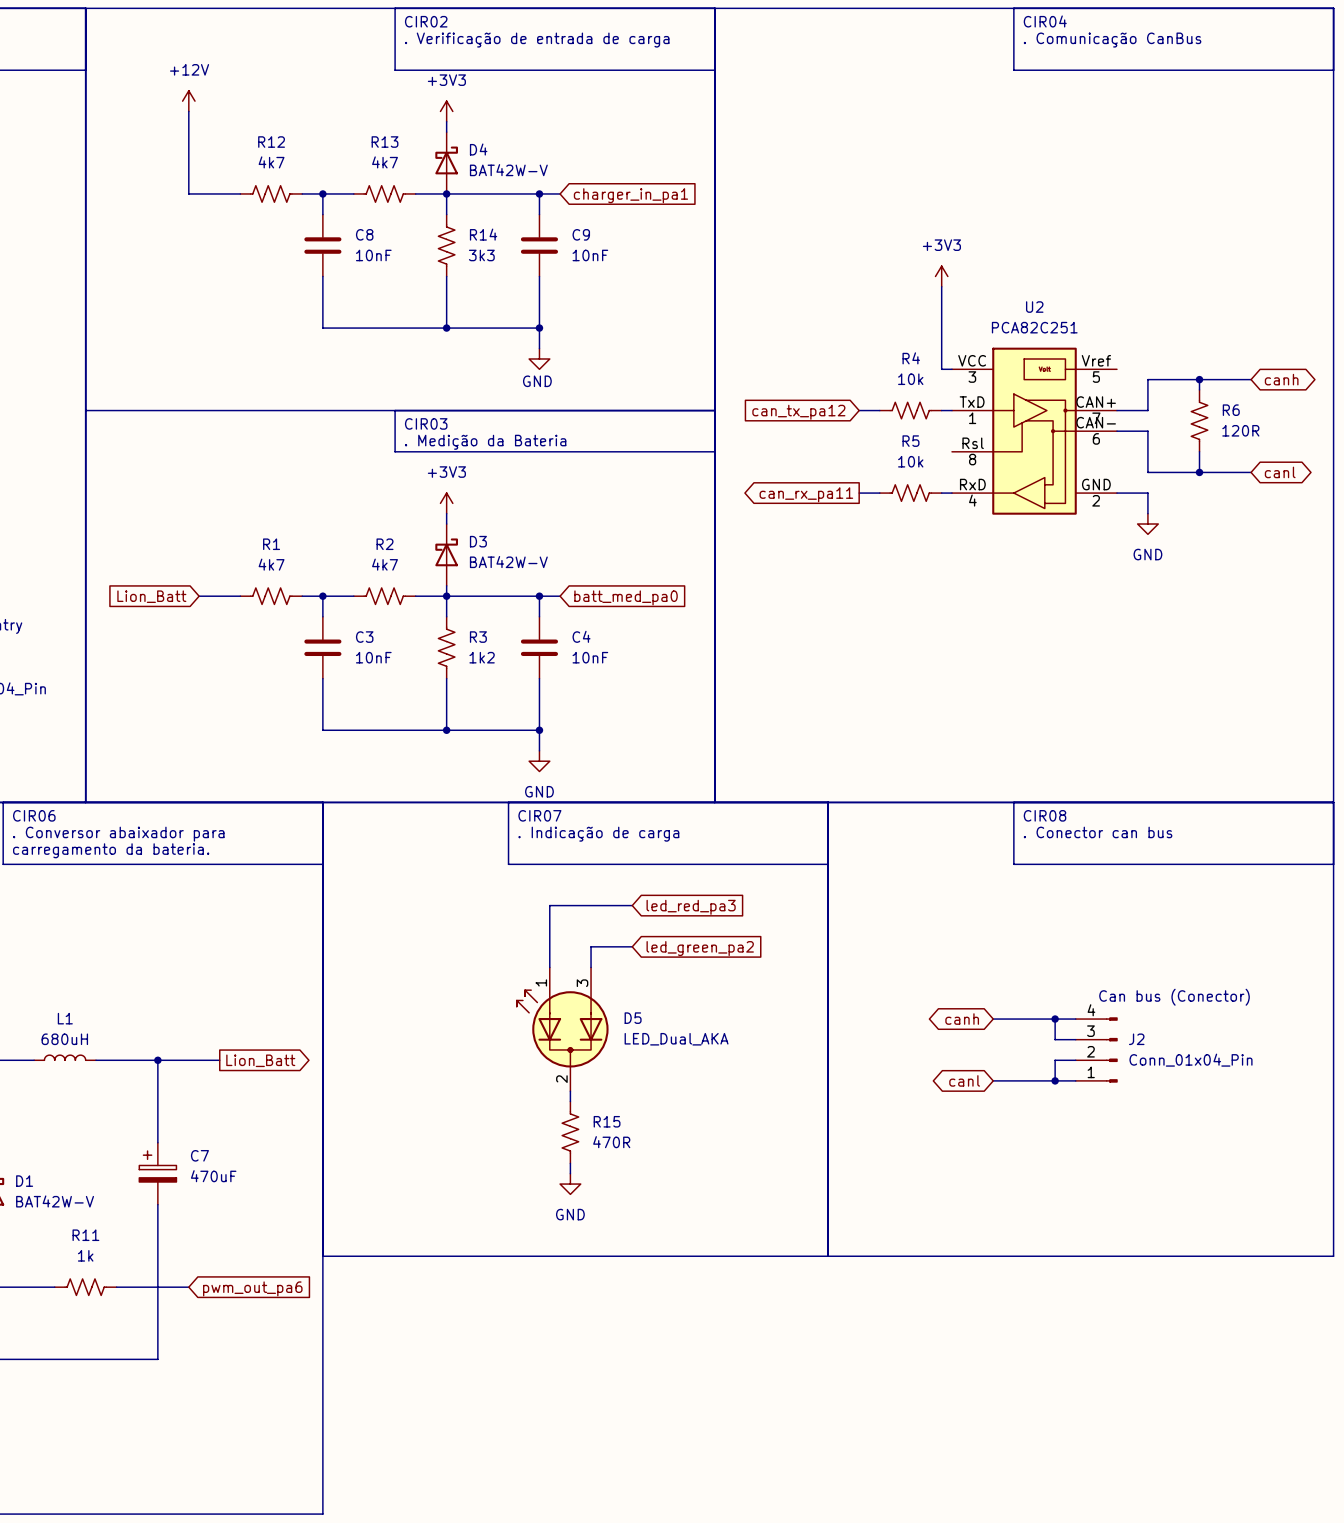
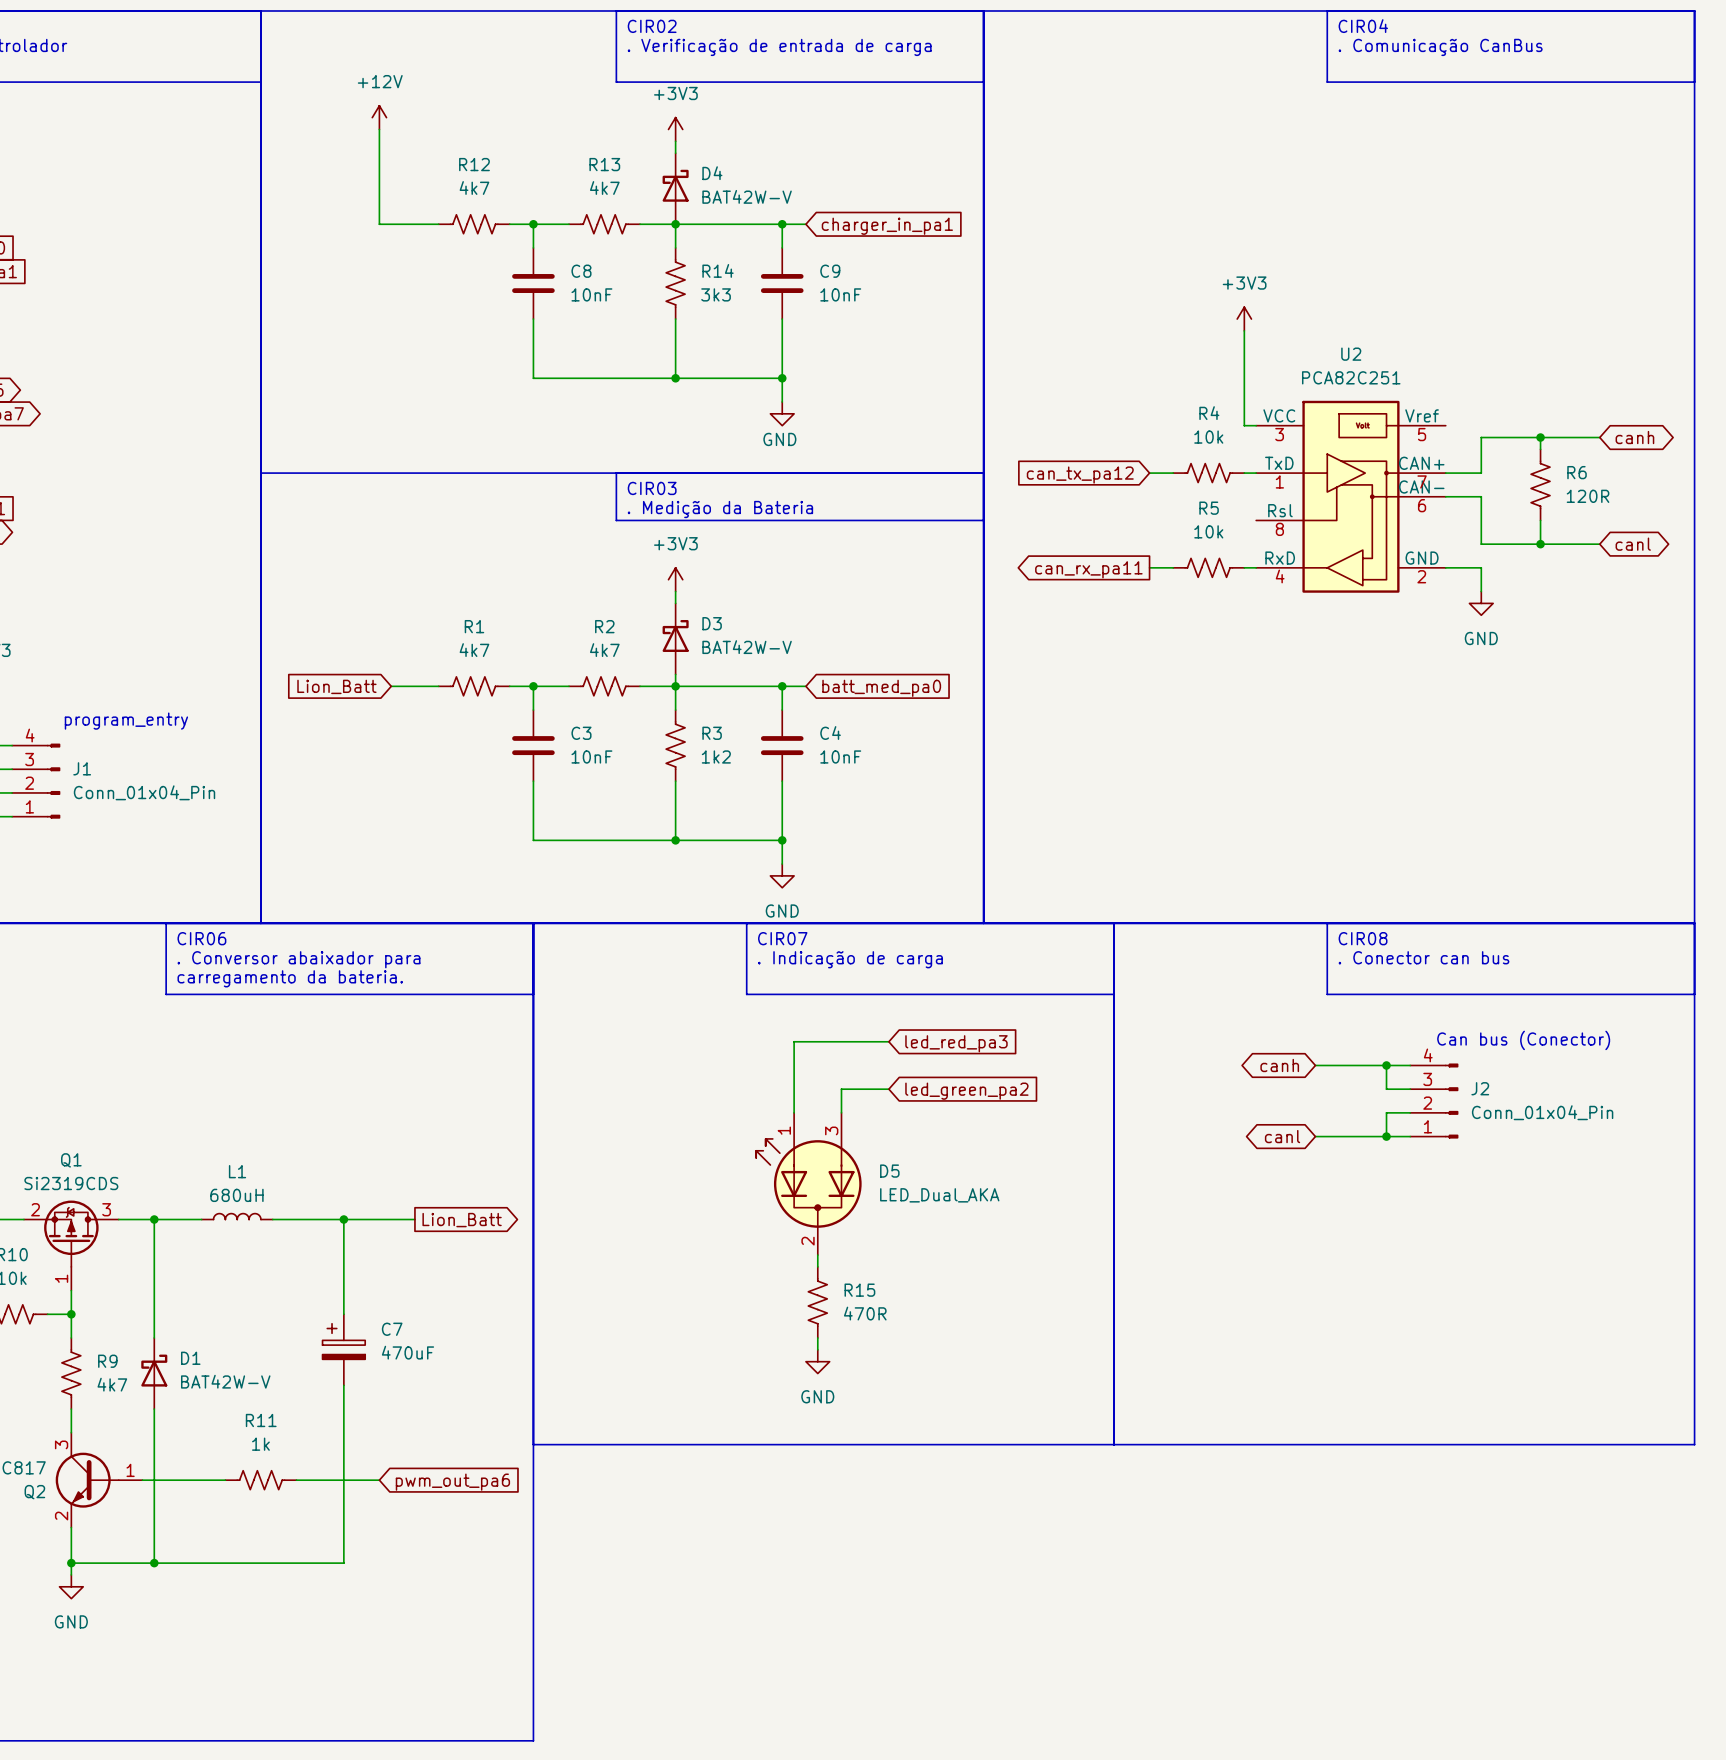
junction: none -> (1386, 1065)
text position: Can bus (Conector) (1174, 997) -> Can bus (Conector) (1523, 1040)
global label position: canh (962, 1019) -> canh (1279, 1065)
wire: (993, 1019) (1075, 1019) -> (1315, 1136) (1410, 1136)
wire: (1055, 1019) (1055, 1039) (1075, 1039) -> (1386, 1065) (1386, 1089) (1410, 1089)
junction position: (1055, 1019) -> (1386, 1136)
J2 position: (1096, 1049) -> (1434, 1101)
wire: (1075, 1060) (1055, 1060) (1055, 1080) -> (1410, 1112) (1386, 1112) (1386, 1136)
global label position: canl (964, 1080) -> canl (1282, 1136)
wire: (993, 1080) (1075, 1080) -> (1315, 1065) (1410, 1065)
junction: (1055, 1080) -> none

